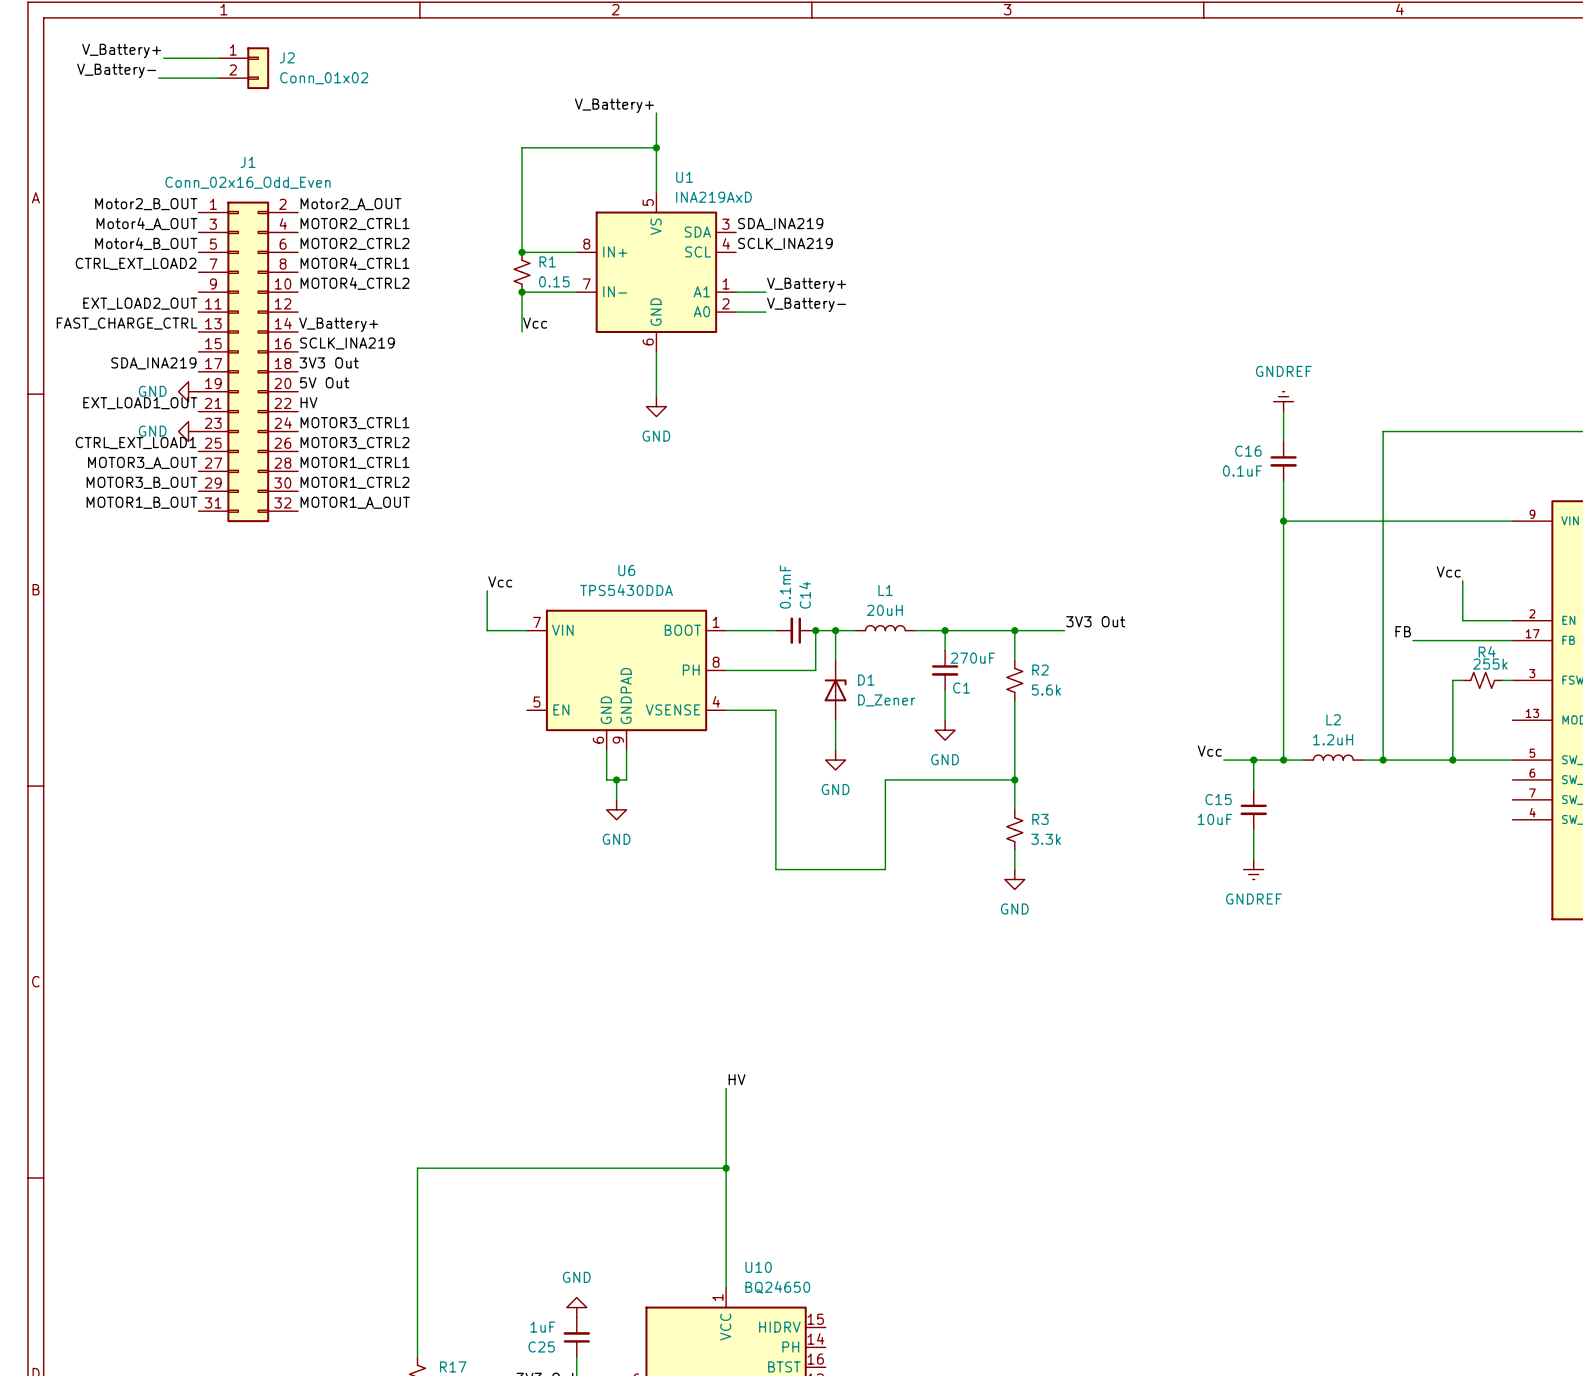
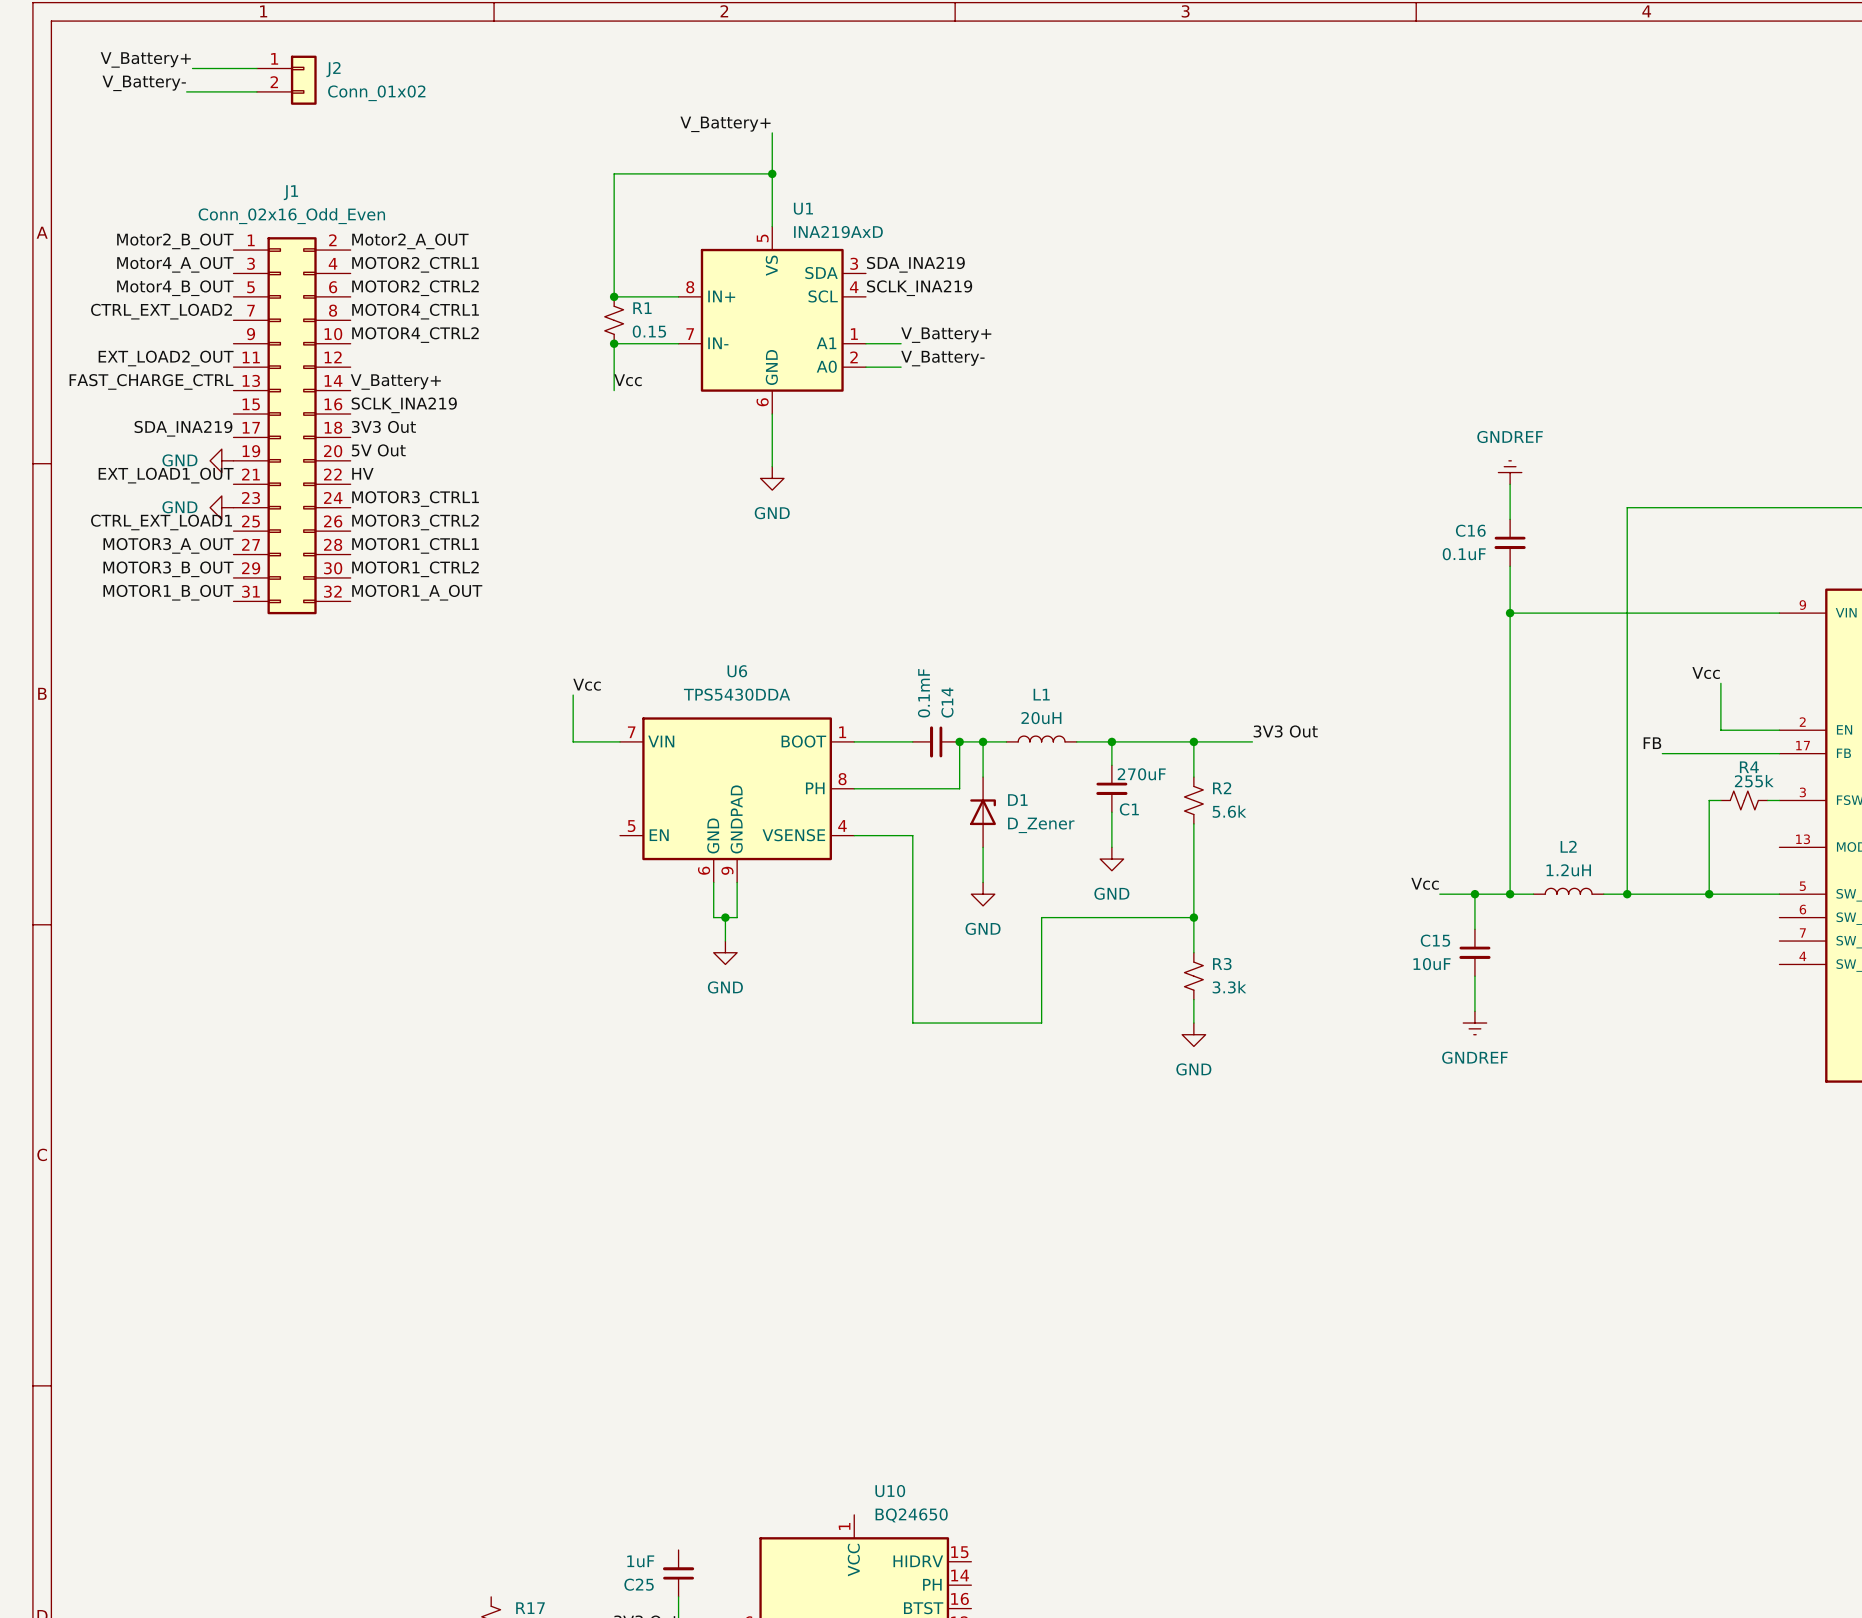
label: HV (737, 1079) -> none
wire: (726, 1088) (726, 1287) -> none
wire: (726, 1168) (417, 1168) (417, 1357) -> none
junction: (726, 1168) -> none
power symbol: GND (576, 1307) -> none

